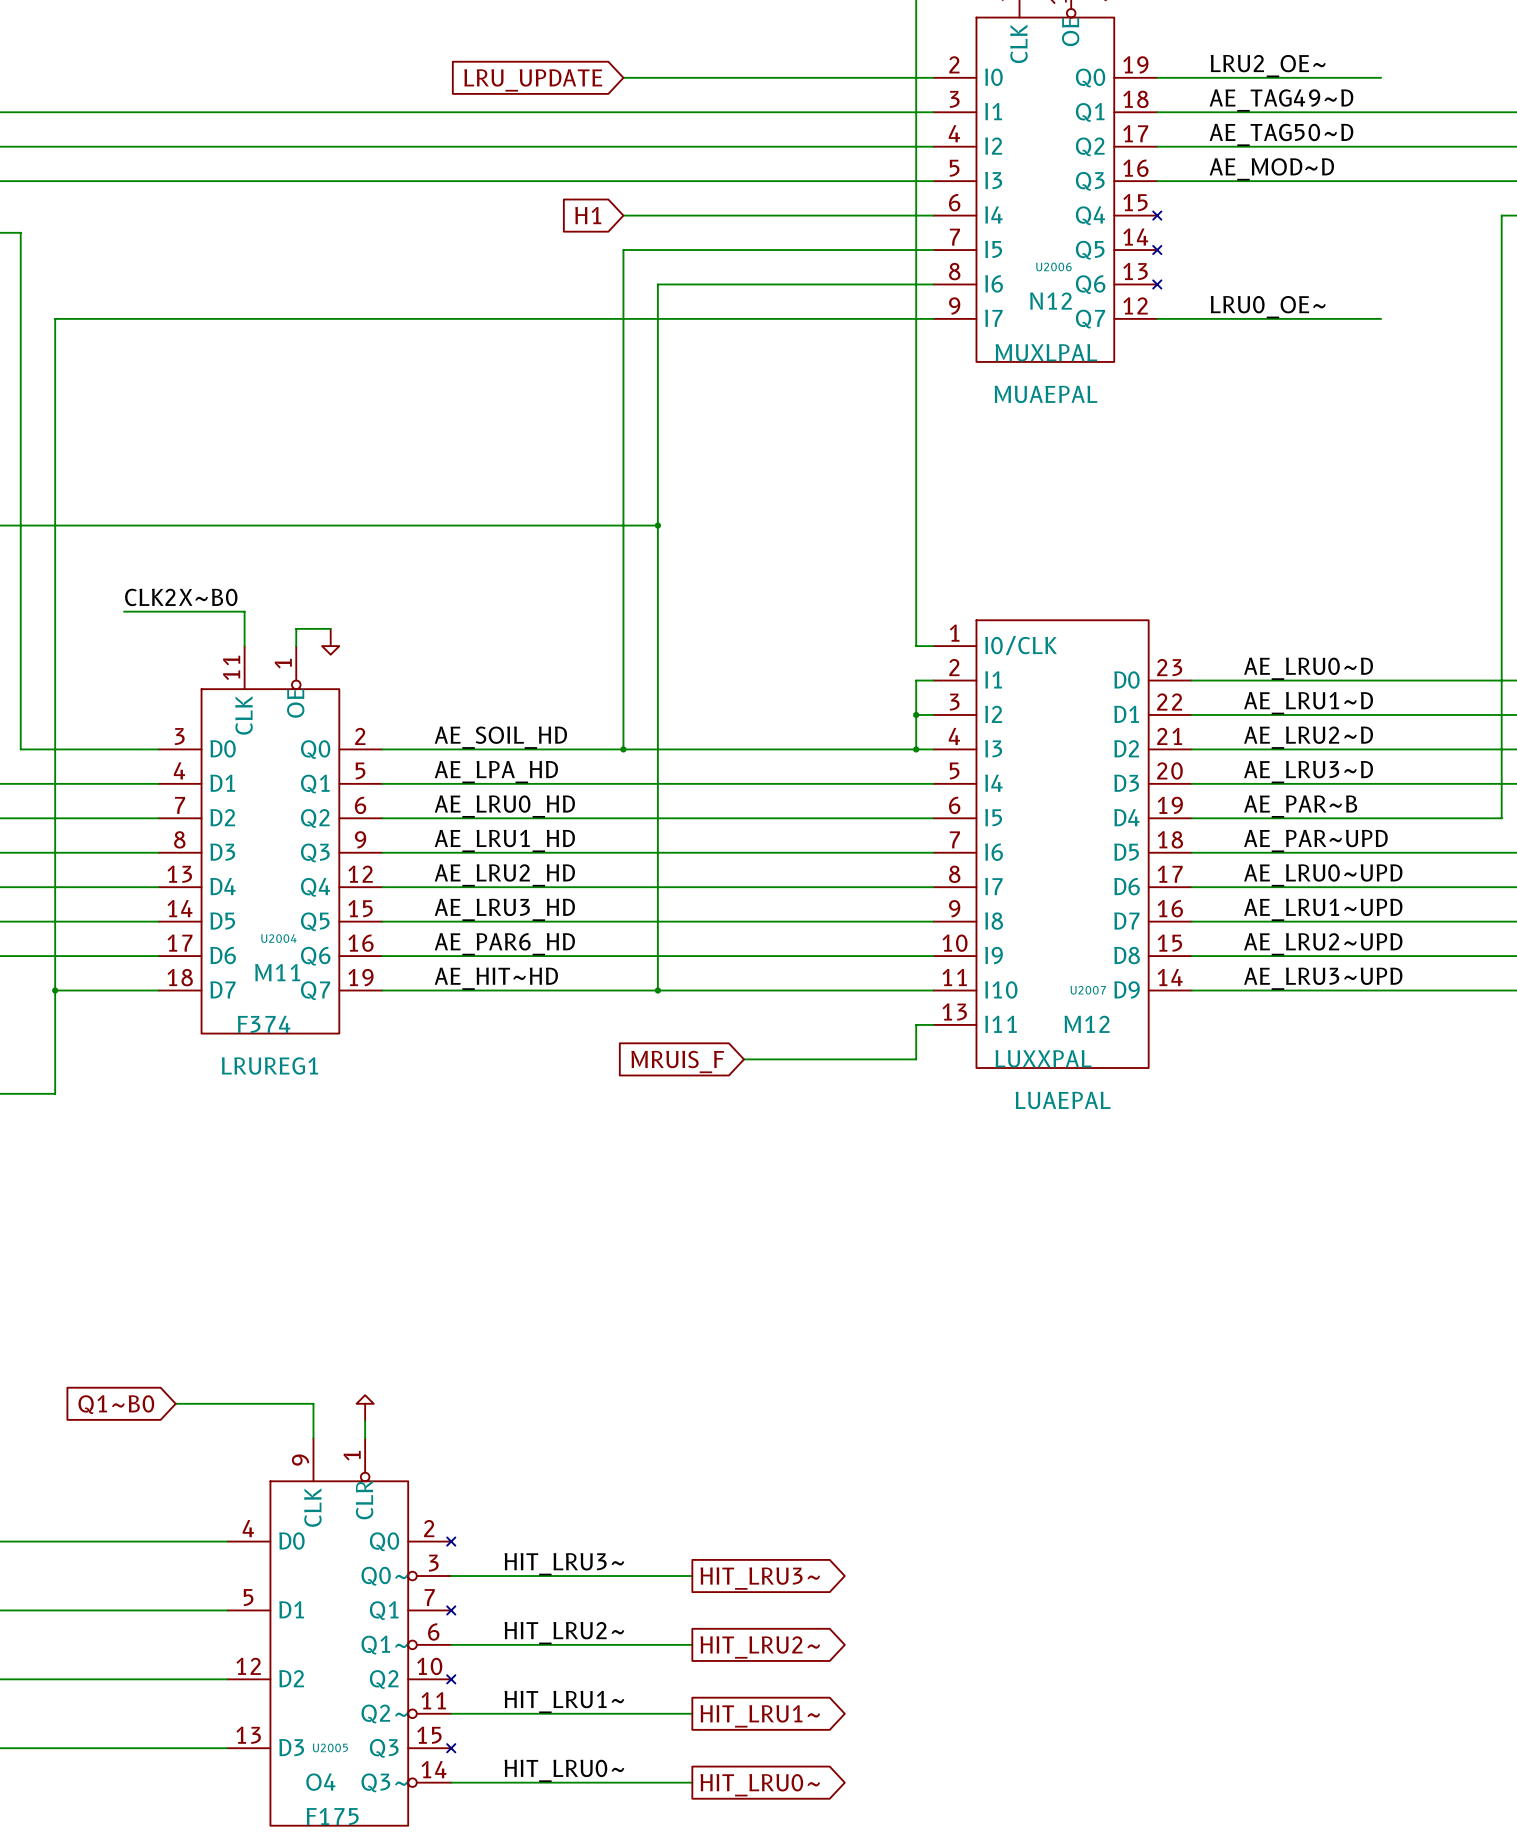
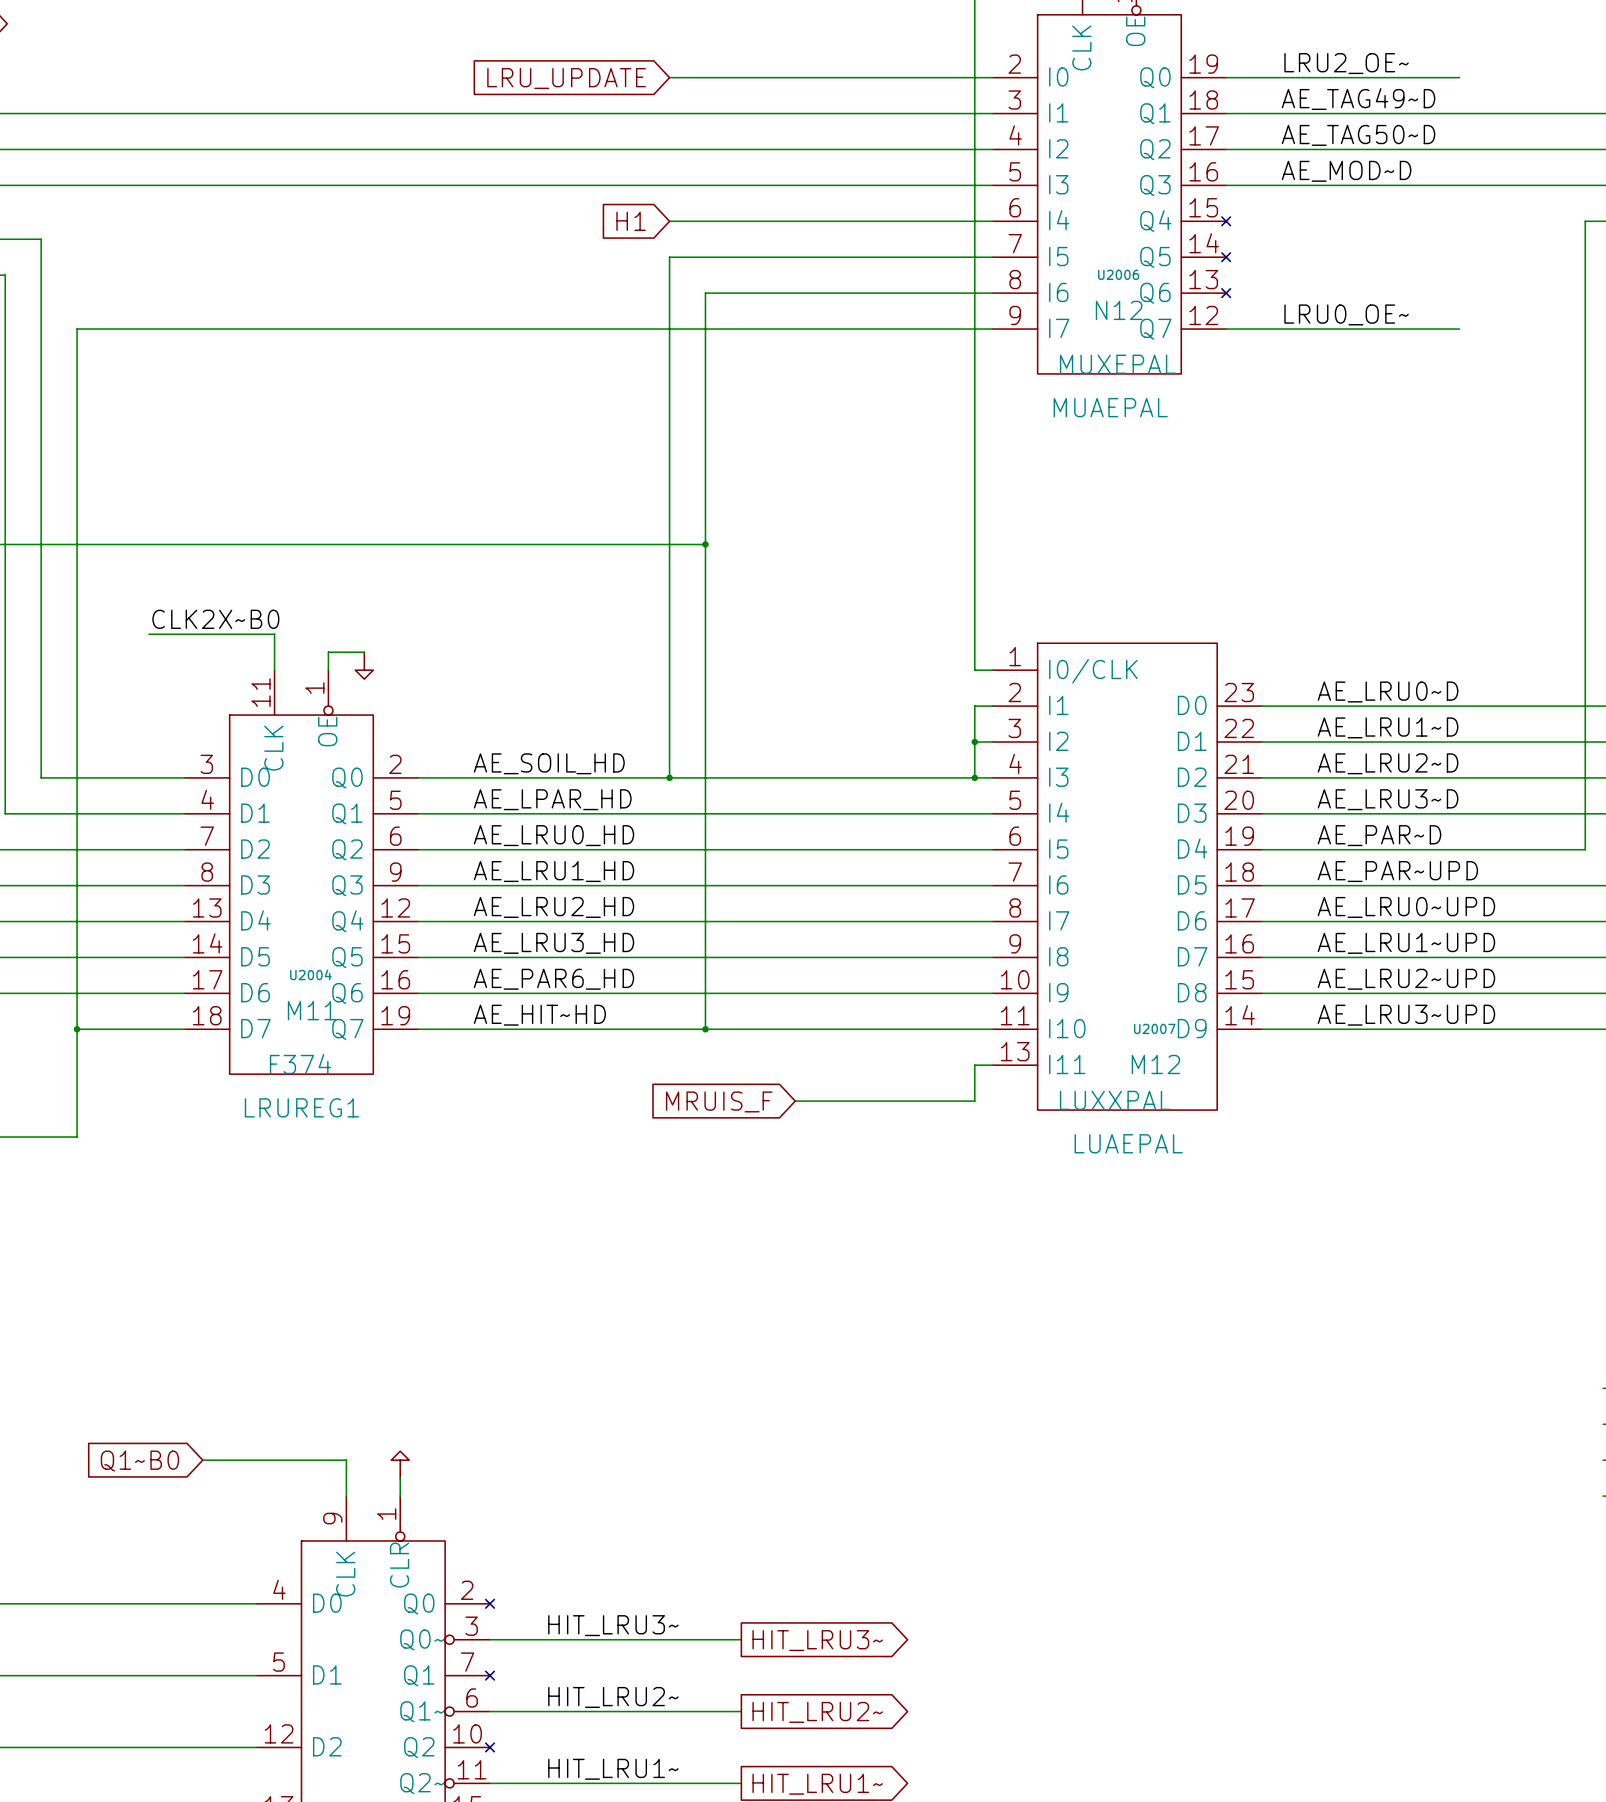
U2006 value: MUXLPAL (1046, 352) -> MUXEPAL (1117, 364)
label: AE_LPA_HD (496, 772) -> AE_LPAR_HD (552, 799)
label: AE_PAR~B (1300, 806) -> AE_PAR~D (1379, 835)

